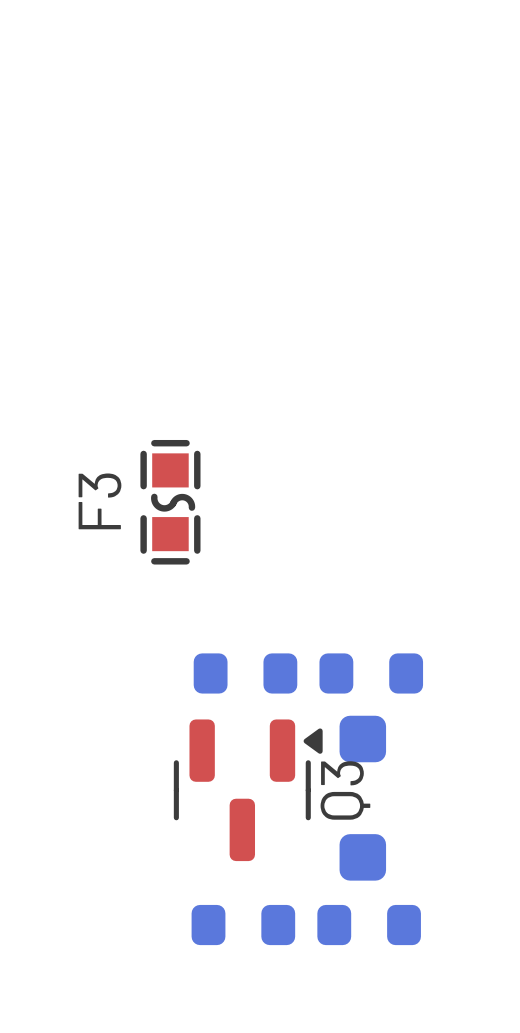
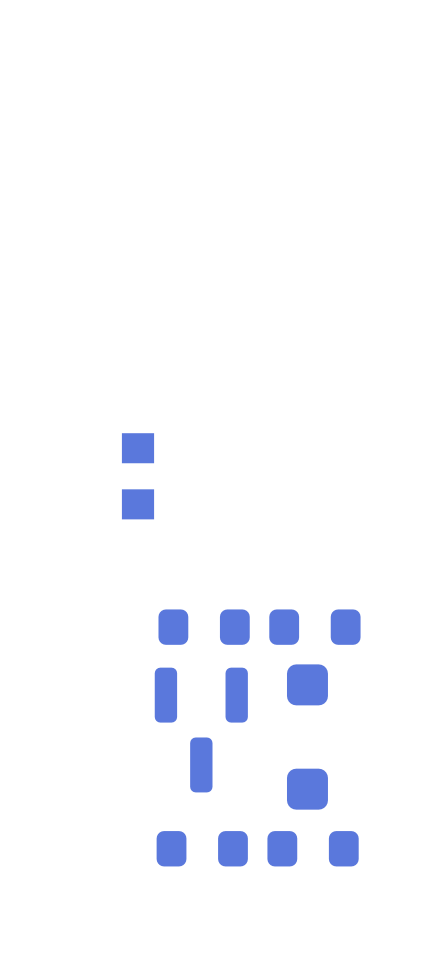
F3 side: top (170, 502) -> bottom (138, 476)
Q3 side: top (248, 790) -> bottom (201, 730)

